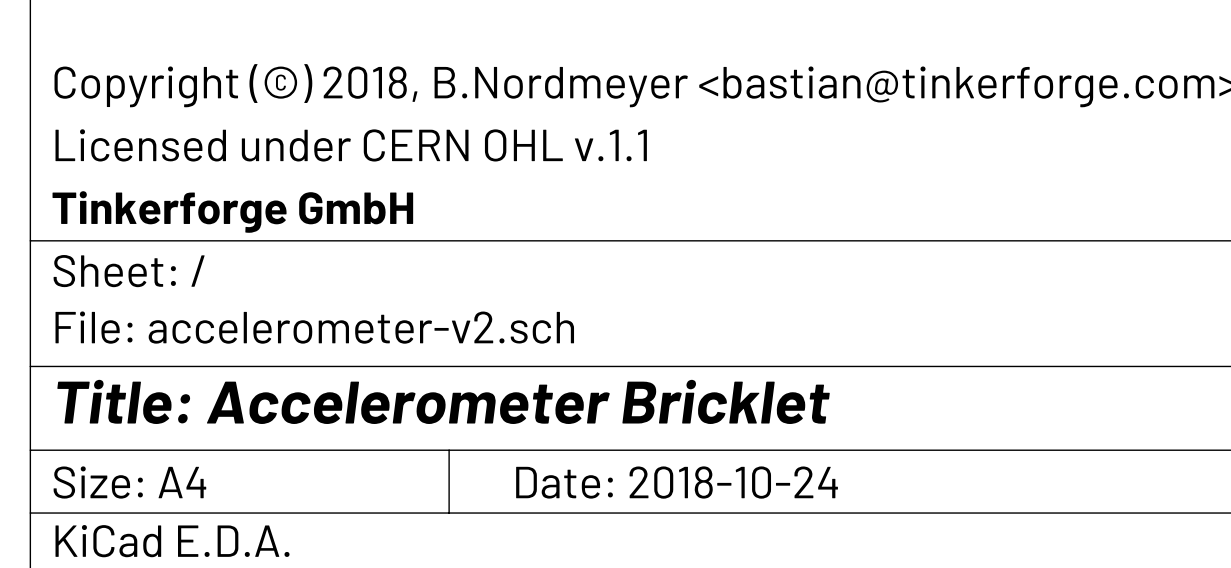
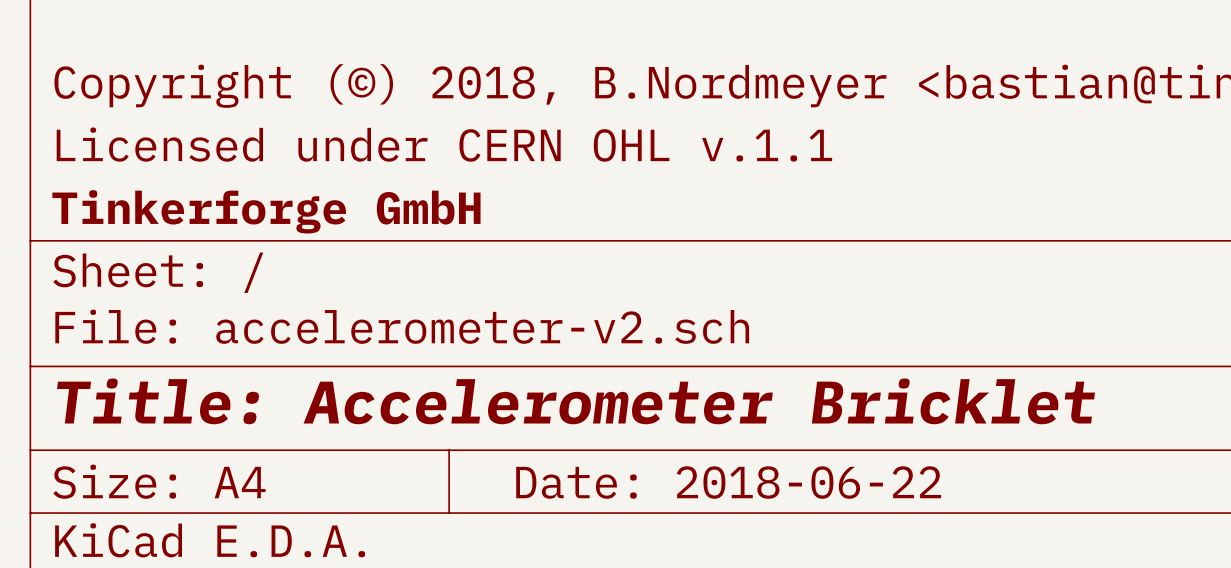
title block: Date: 2018-10-24 (677, 482) -> Date: 2018-06-22 (728, 482)

